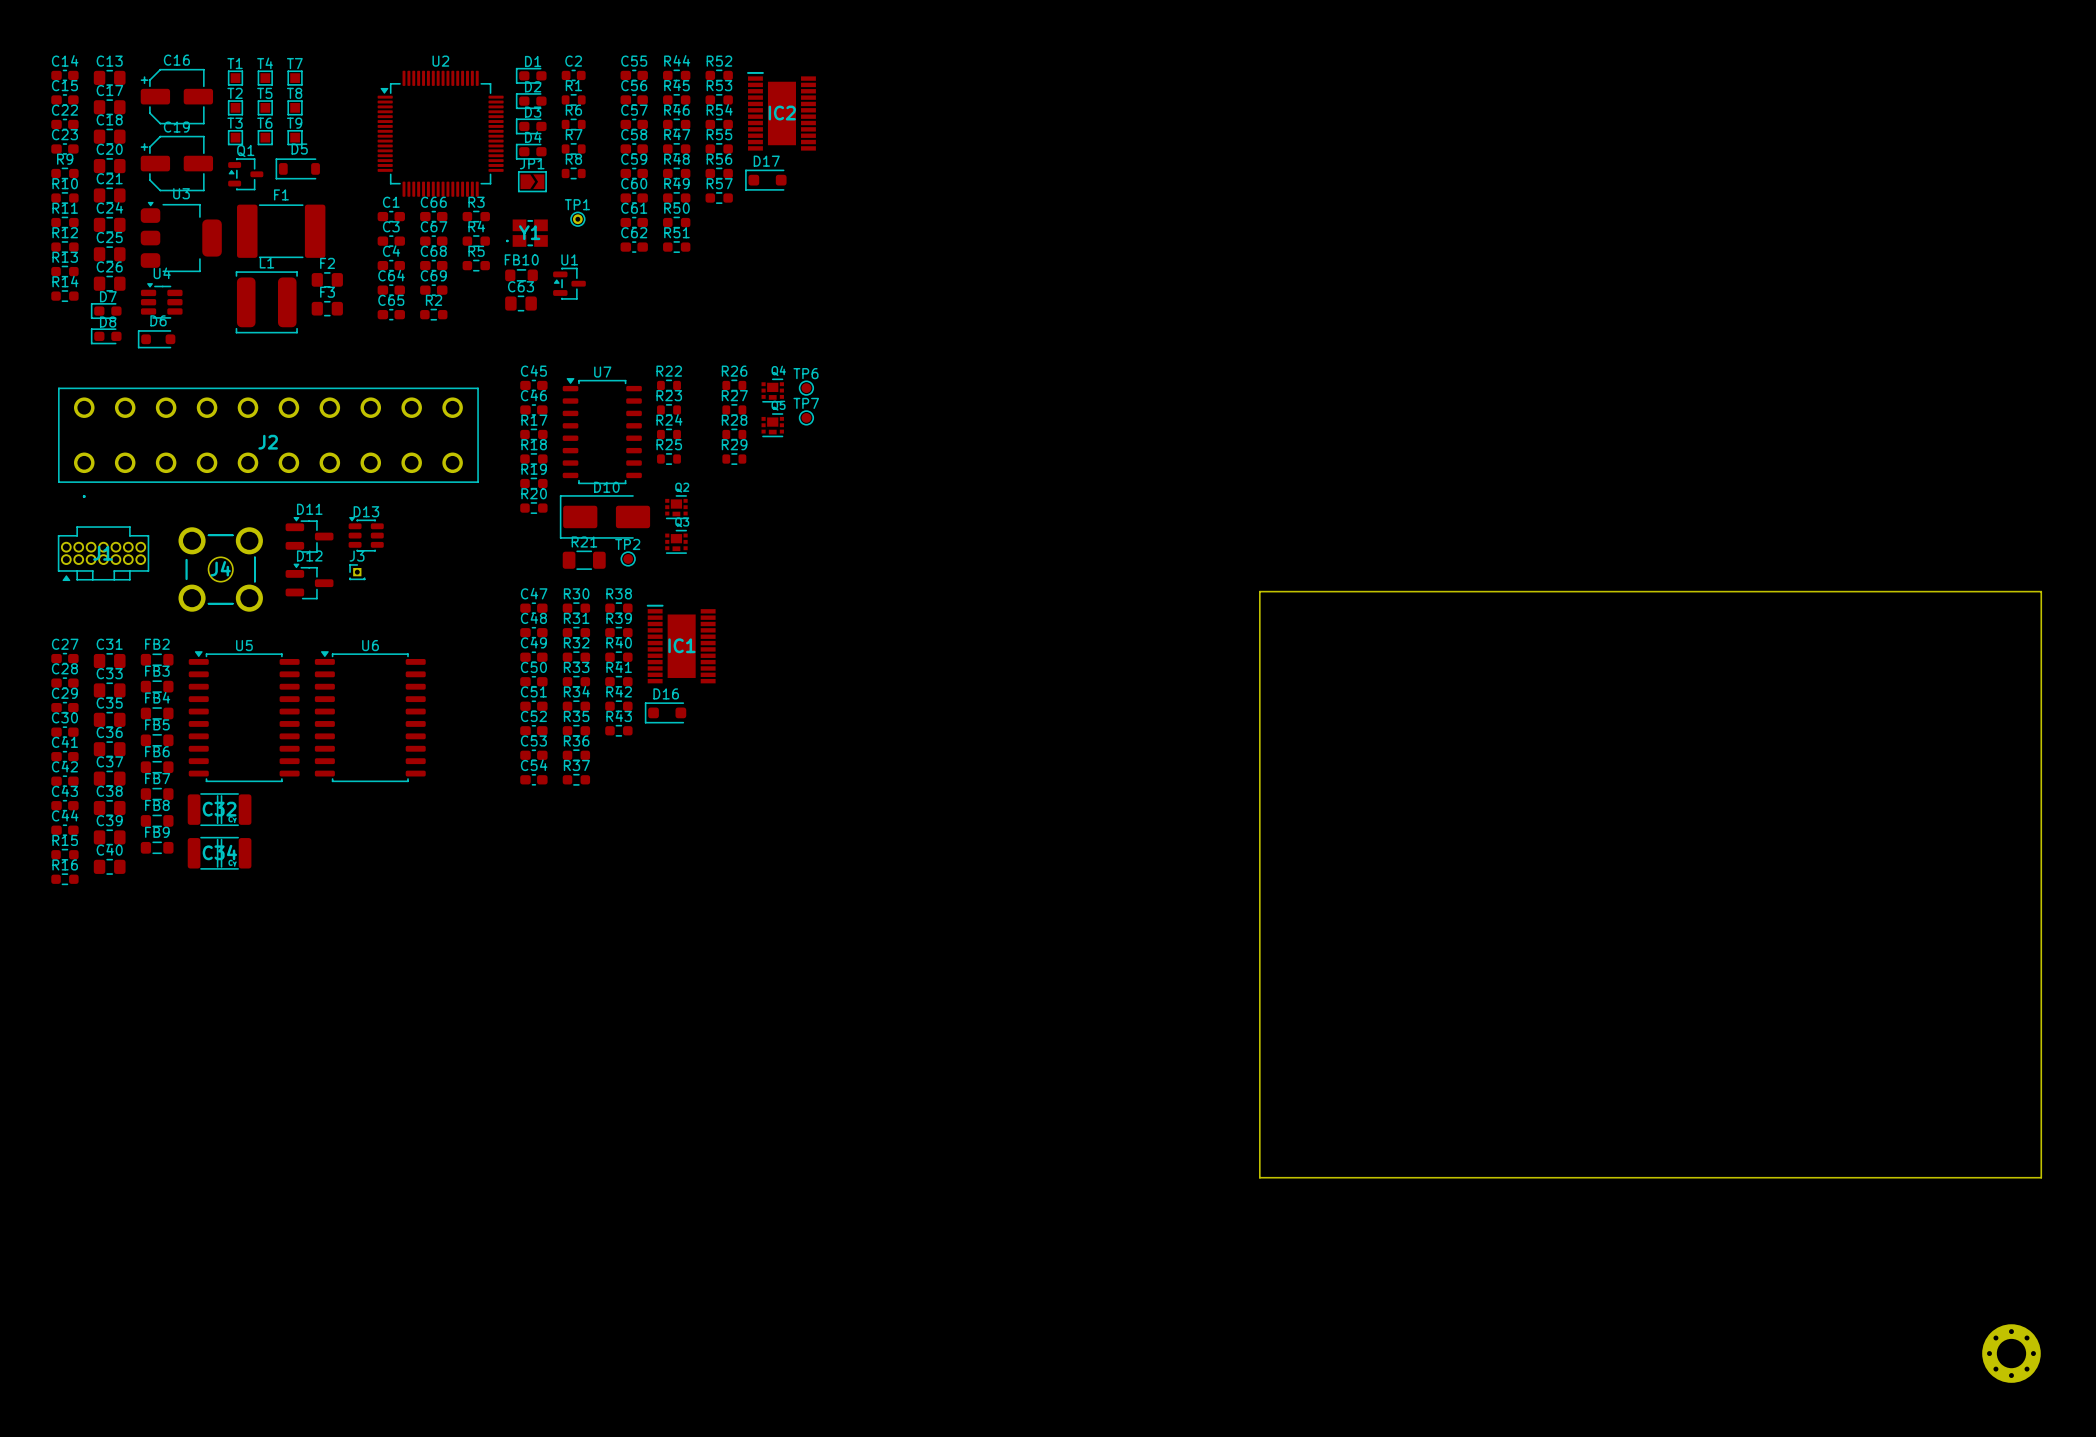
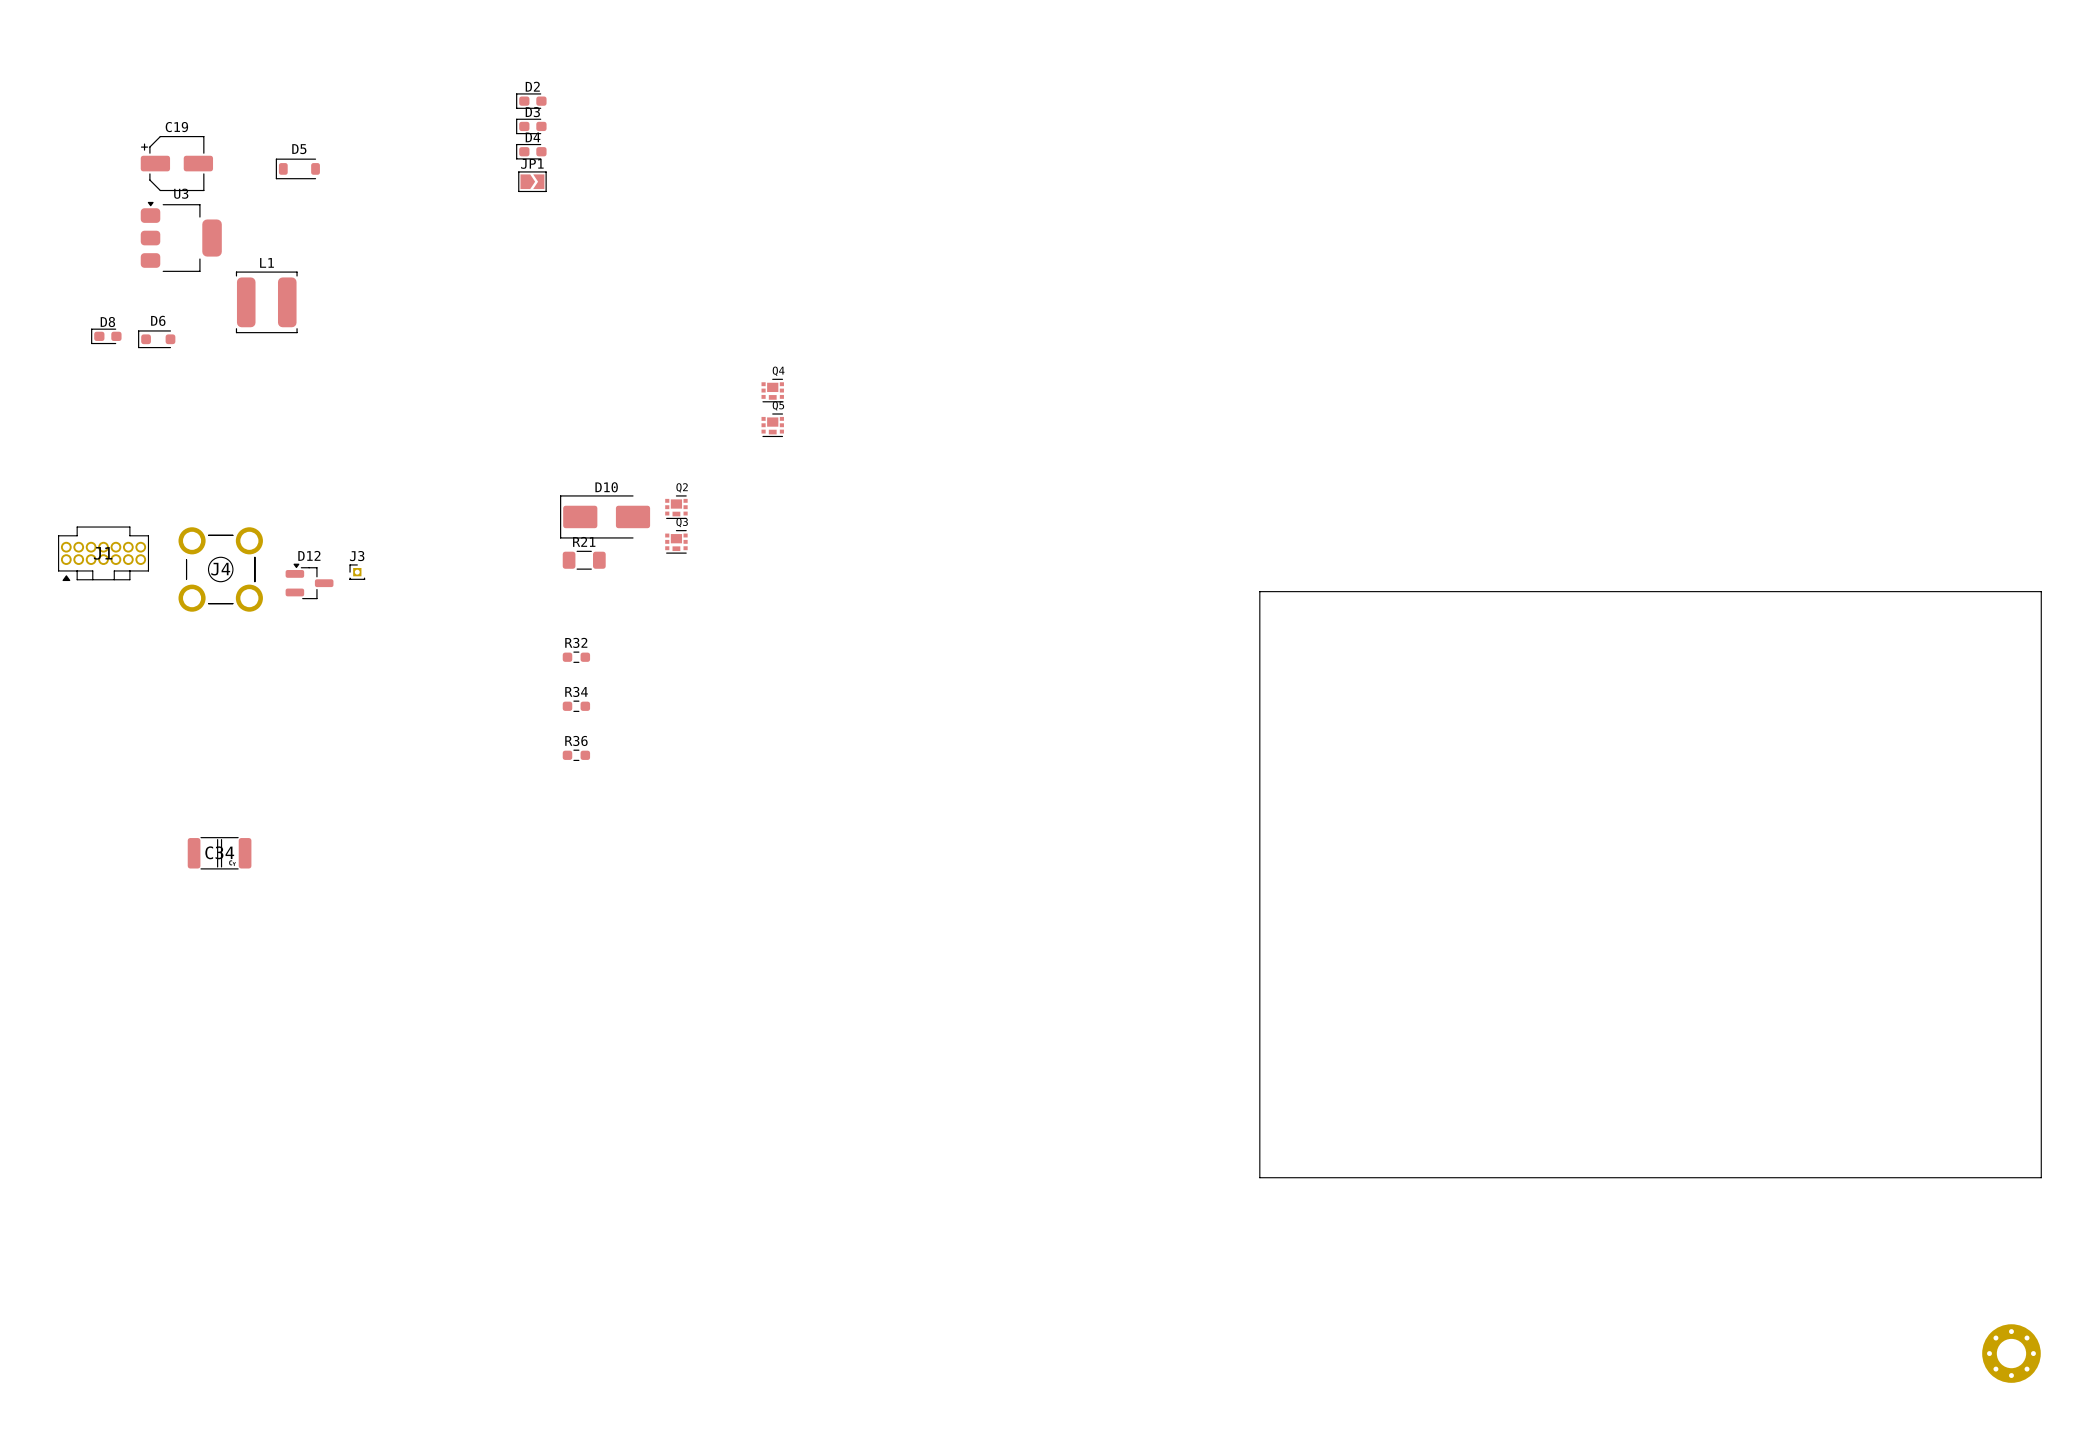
C14: (64, 75) -> none
D1: (531, 75) -> none
C2: (573, 75) -> none
C55: (634, 75) -> none
R44: (676, 75) -> none
R52: (719, 75) -> none
C13: (109, 77) -> none
T1: (235, 78) -> none
T4: (265, 78) -> none
T7: (295, 78) -> none
C16: (176, 96) -> none
C15: (64, 99) -> none
R1: (573, 99) -> none
C56: (634, 99) -> none
R45: (676, 99) -> none
R53: (719, 99) -> none
C17: (109, 107) -> none
T2: (235, 107) -> none
T5: (265, 107) -> none
T8: (295, 107) -> none
IC2: (781, 111) -> none
C22: (64, 124) -> none
R6: (573, 124) -> none
C57: (634, 124) -> none
R46: (676, 124) -> none
R54: (719, 124) -> none
U2: (440, 133) -> none
C18: (109, 136) -> none
T3: (235, 137) -> none
T6: (265, 137) -> none
T9: (295, 137) -> none
C23: (64, 148) -> none
R7: (573, 148) -> none
C58: (634, 148) -> none
R47: (676, 148) -> none
R55: (719, 148) -> none
C20: (109, 166) -> none
R9: (64, 173) -> none
R8: (573, 173) -> none
C59: (634, 173) -> none
R48: (676, 173) -> none
R56: (719, 173) -> none
Q1: (245, 174) -> none
D17: (765, 180) -> none
C21: (109, 195) -> none
R10: (64, 198) -> none
C60: (634, 198) -> none
R49: (676, 198) -> none
R57: (719, 198) -> none
C1: (391, 216) -> none
C66: (433, 216) -> none
R3: (476, 216) -> none
TP1: (577, 219) -> none
R11: (64, 222) -> none
C61: (634, 222) -> none
R50: (676, 222) -> none
C24: (109, 224) -> none
F1: (281, 231) -> none
Y1: (527, 233) -> none
C3: (391, 241) -> none
C67: (433, 241) -> none
R4: (476, 241) -> none
R12: (64, 247) -> none
C62: (634, 247) -> none
R51: (676, 247) -> none
C25: (109, 254) -> none
C4: (391, 265) -> none
C68: (433, 265) -> none
R5: (476, 265) -> none
R13: (64, 271) -> none
FB10: (521, 275) -> none
F2: (327, 279) -> none
C26: (109, 283) -> none
U1: (569, 283) -> none
C64: (391, 290) -> none
C69: (433, 290) -> none
R14: (64, 296) -> none
U4: (161, 300) -> none
C63: (521, 303) -> none
F3: (327, 308) -> none
D7: (106, 311) -> none
C65: (391, 314) -> none
R2: (433, 314) -> none
C45: (533, 385) -> none
R22: (669, 385) -> none
R26: (734, 385) -> none
TP6: (806, 388) -> none
C46: (533, 410) -> none
R23: (669, 410) -> none
R27: (734, 410) -> none
TP7: (806, 417) -> none
U7: (602, 431) -> none
R17: (533, 434) -> none
R24: (669, 434) -> none
R28: (734, 434) -> none
J2: (268, 442) -> none
R18: (533, 459) -> none
R25: (669, 459) -> none
R29: (734, 459) -> none
R19: (533, 483) -> none
R20: (533, 508) -> none
D11: (309, 534) -> none
D13: (366, 534) -> none
TP2: (628, 558) -> none
C47: (533, 608) -> none
R30: (576, 608) -> none
R38: (618, 608) -> none
C48: (533, 632) -> none
R31: (576, 632) -> none
R39: (618, 632) -> none
IC1: (681, 644) -> none
C49: (533, 657) -> none
R40: (618, 657) -> none
C27: (64, 658) -> none
FB2: (157, 659) -> none
C31: (109, 661) -> none
C50: (533, 681) -> none
R33: (576, 681) -> none
R41: (618, 681) -> none
C28: (64, 683) -> none
FB3: (157, 686) -> none
C33: (109, 690) -> none
C51: (533, 706) -> none
R42: (618, 706) -> none
C29: (64, 707) -> none
D16: (665, 712) -> none
FB4: (157, 713) -> none
U5: (244, 716) -> none
U6: (370, 716) -> none
C35: (109, 719) -> none
C52: (533, 730) -> none
R35: (576, 730) -> none
R43: (618, 730) -> none
C30: (64, 732) -> none
FB5: (157, 740) -> none
C36: (109, 749) -> none
C53: (533, 755) -> none
C41: (64, 756) -> none
FB6: (157, 767) -> none
C37: (109, 778) -> none
C54: (533, 779) -> none
R37: (576, 779) -> none
C42: (64, 781) -> none
FB7: (157, 794) -> none
C43: (64, 805) -> none
C38: (109, 808) -> none
C32: (219, 809) -> none
FB8: (157, 820) -> none
C44: (64, 830) -> none
C39: (109, 837) -> none
FB9: (157, 847) -> none
R15: (64, 854) -> none
C40: (109, 866) -> none
R16: (64, 879) -> none

